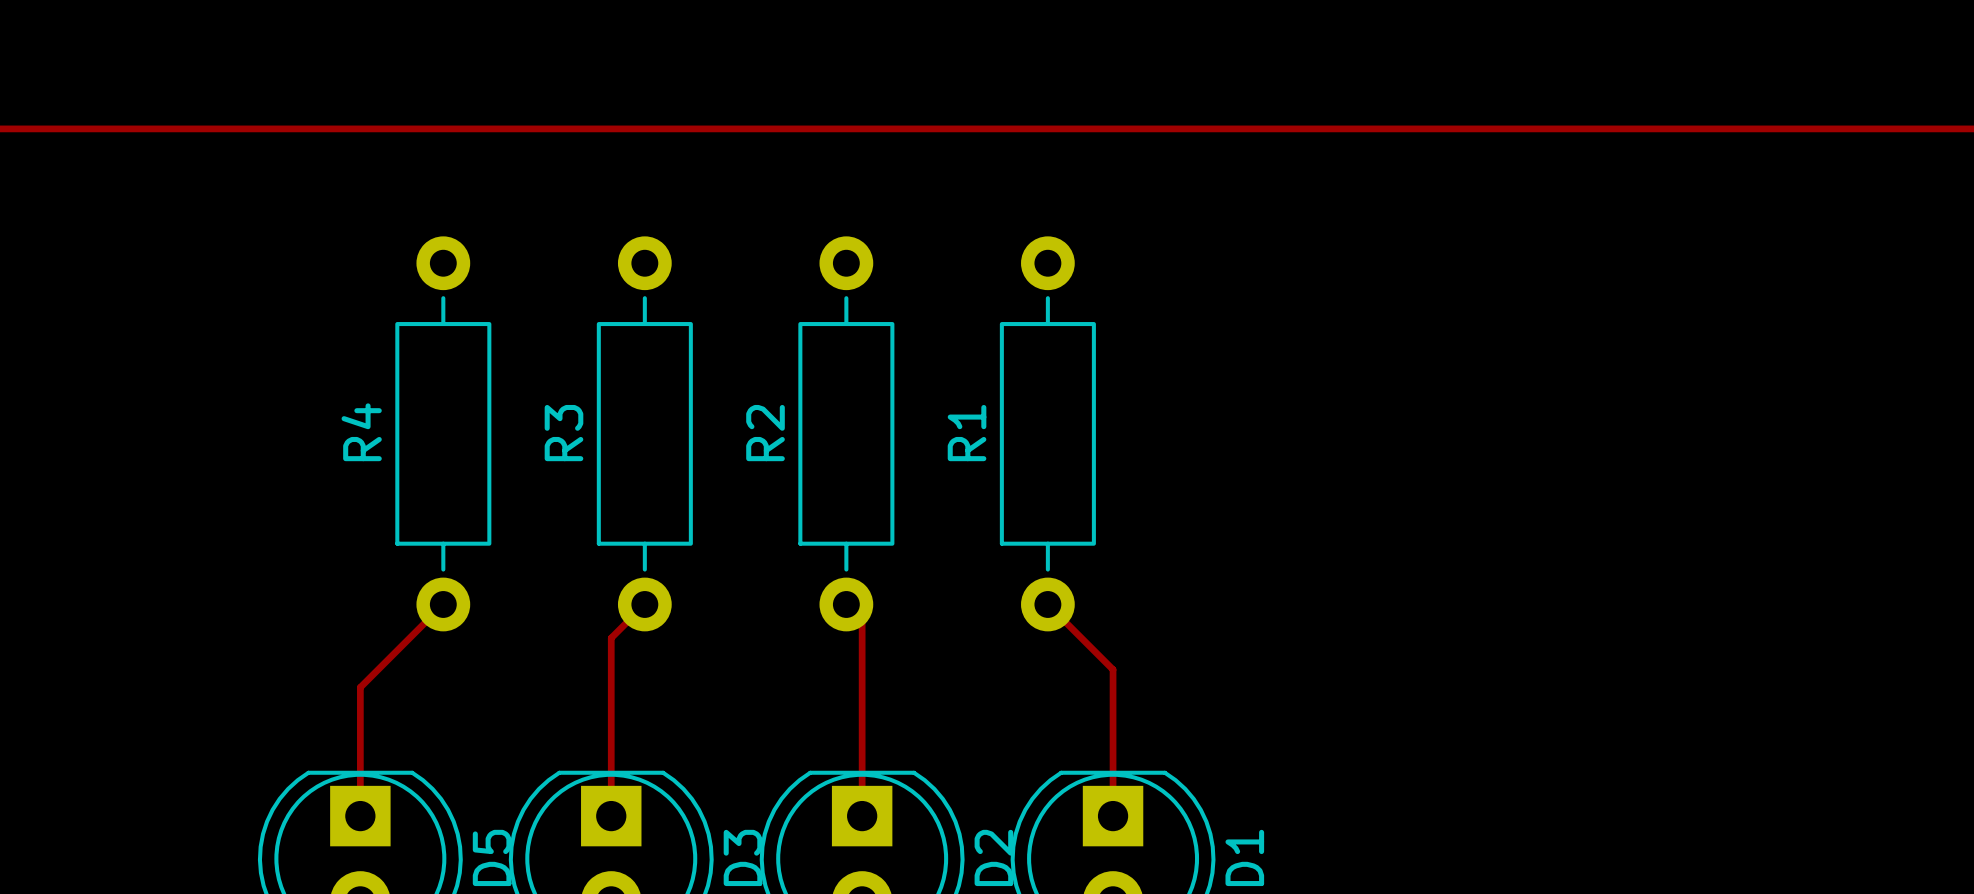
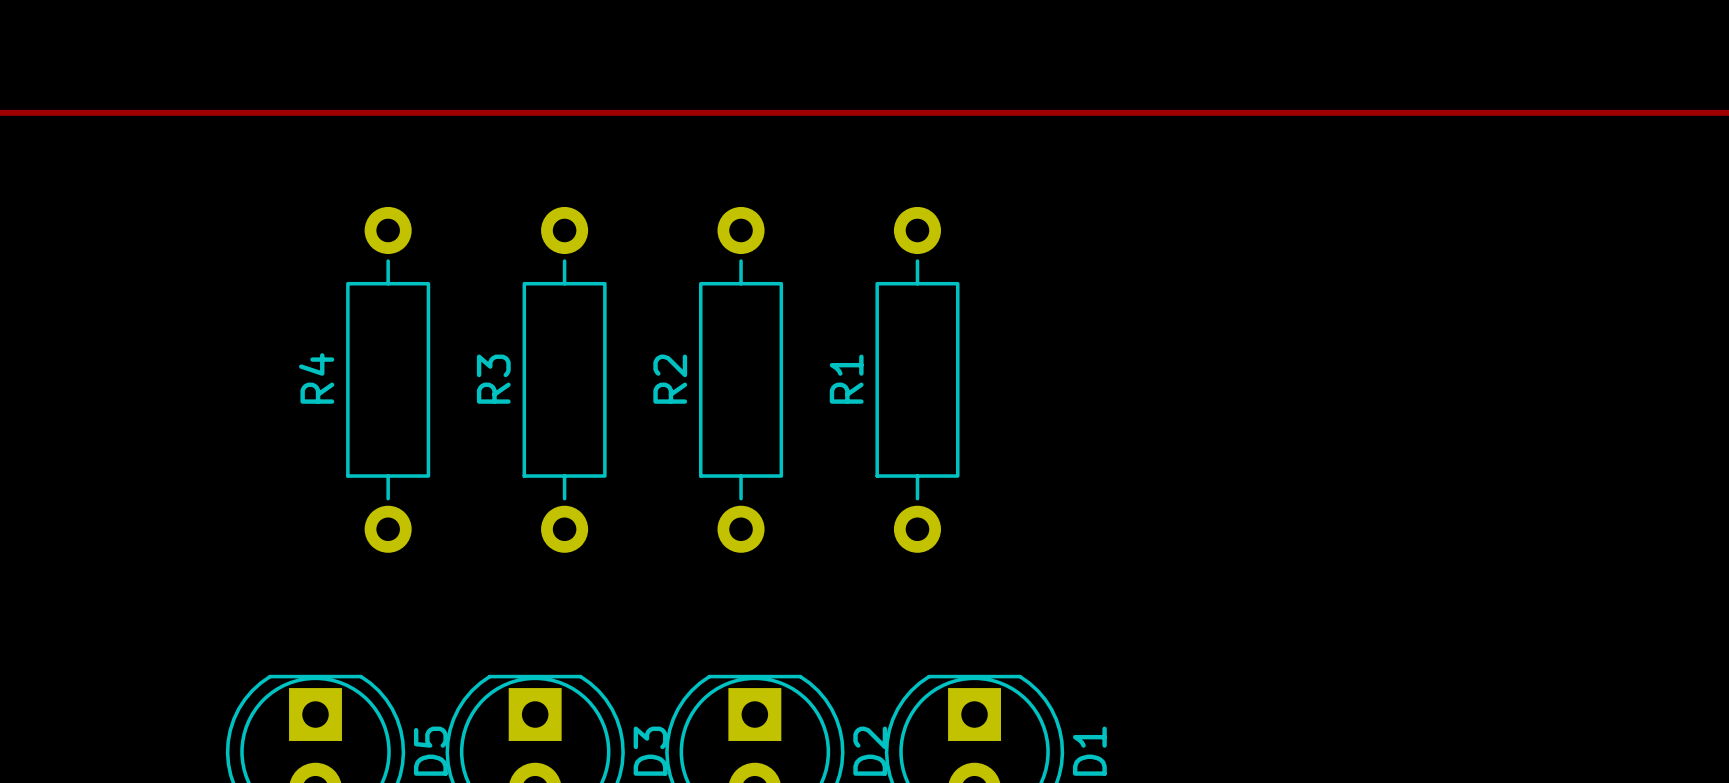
track: (443, 604) (360, 687) (360, 816) -> none
track: (644, 604) (611, 638) (611, 816) -> none
track: (846, 604) (862, 620) (862, 816) -> none
track: (1047, 604) (1113, 669) (1113, 816) -> none

